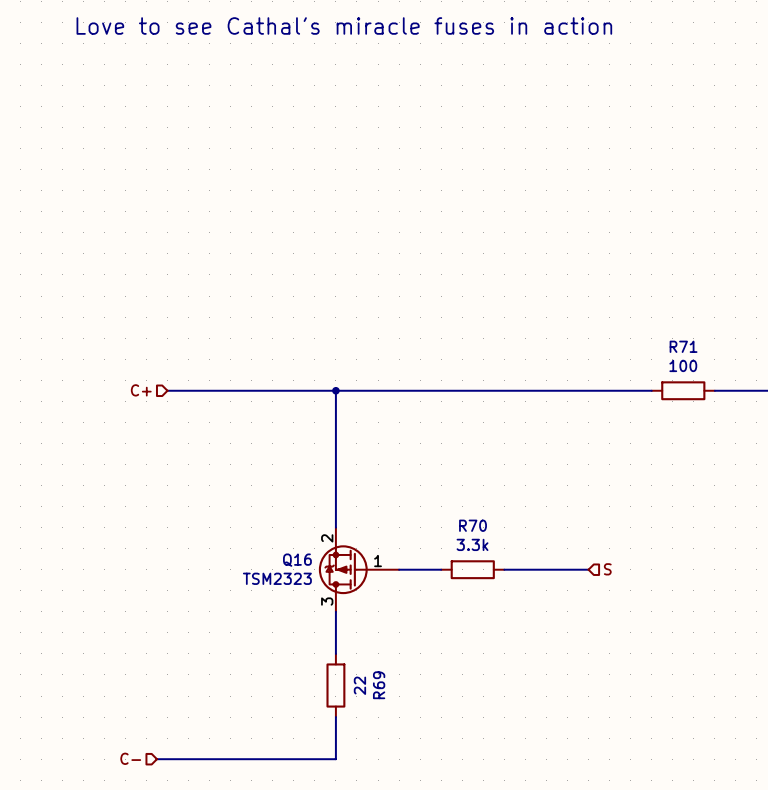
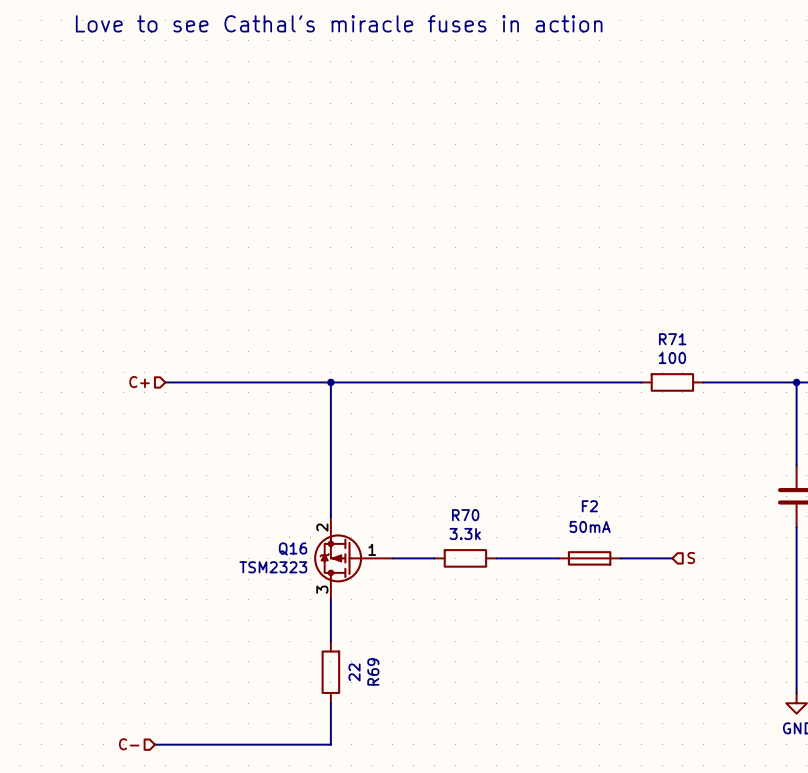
F2: none -> 50mA (589, 558)
hierarchical label position: S (607, 569) -> S (691, 558)
wire: none -> (620, 558) (672, 558)

